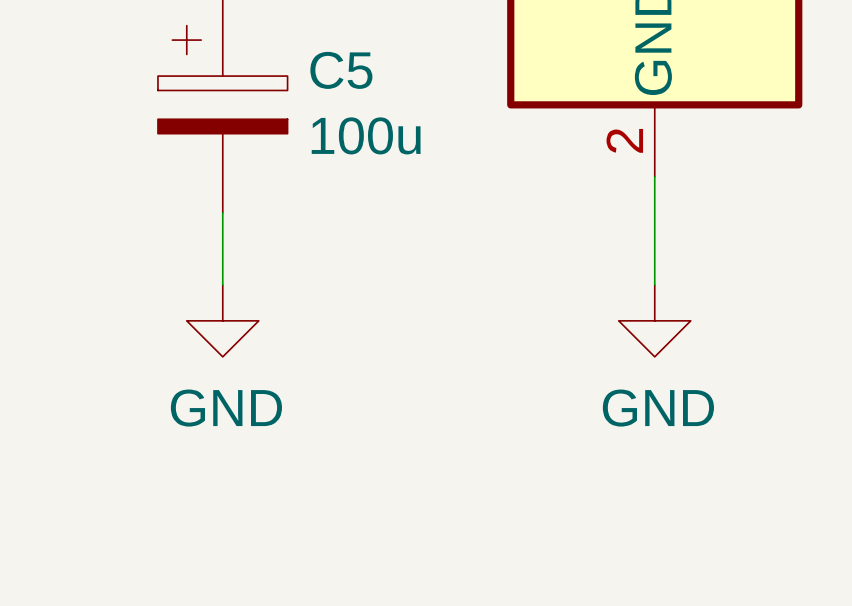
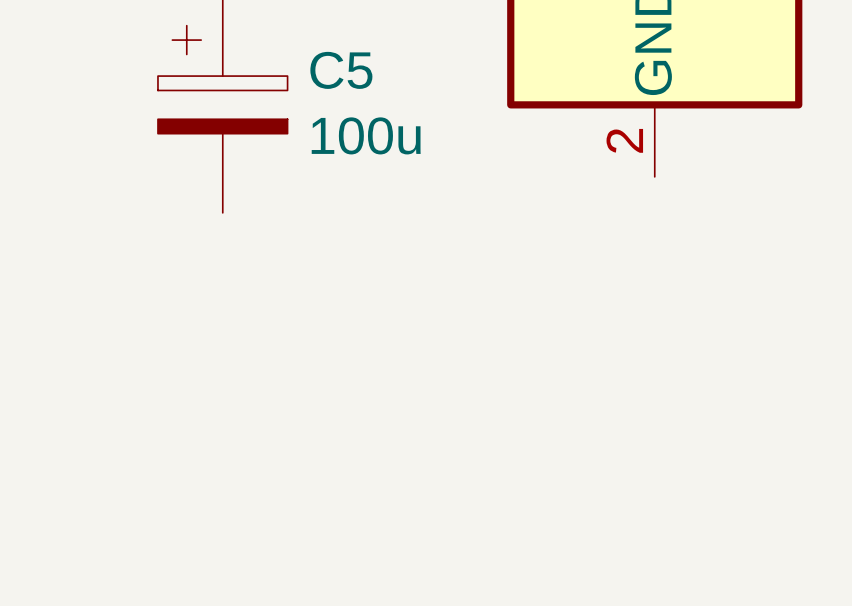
wire: (654, 176) (654, 284) -> none
wire: (222, 212) (222, 284) -> none
power symbol: GND (222, 320) -> none
power symbol: GND (654, 320) -> none

